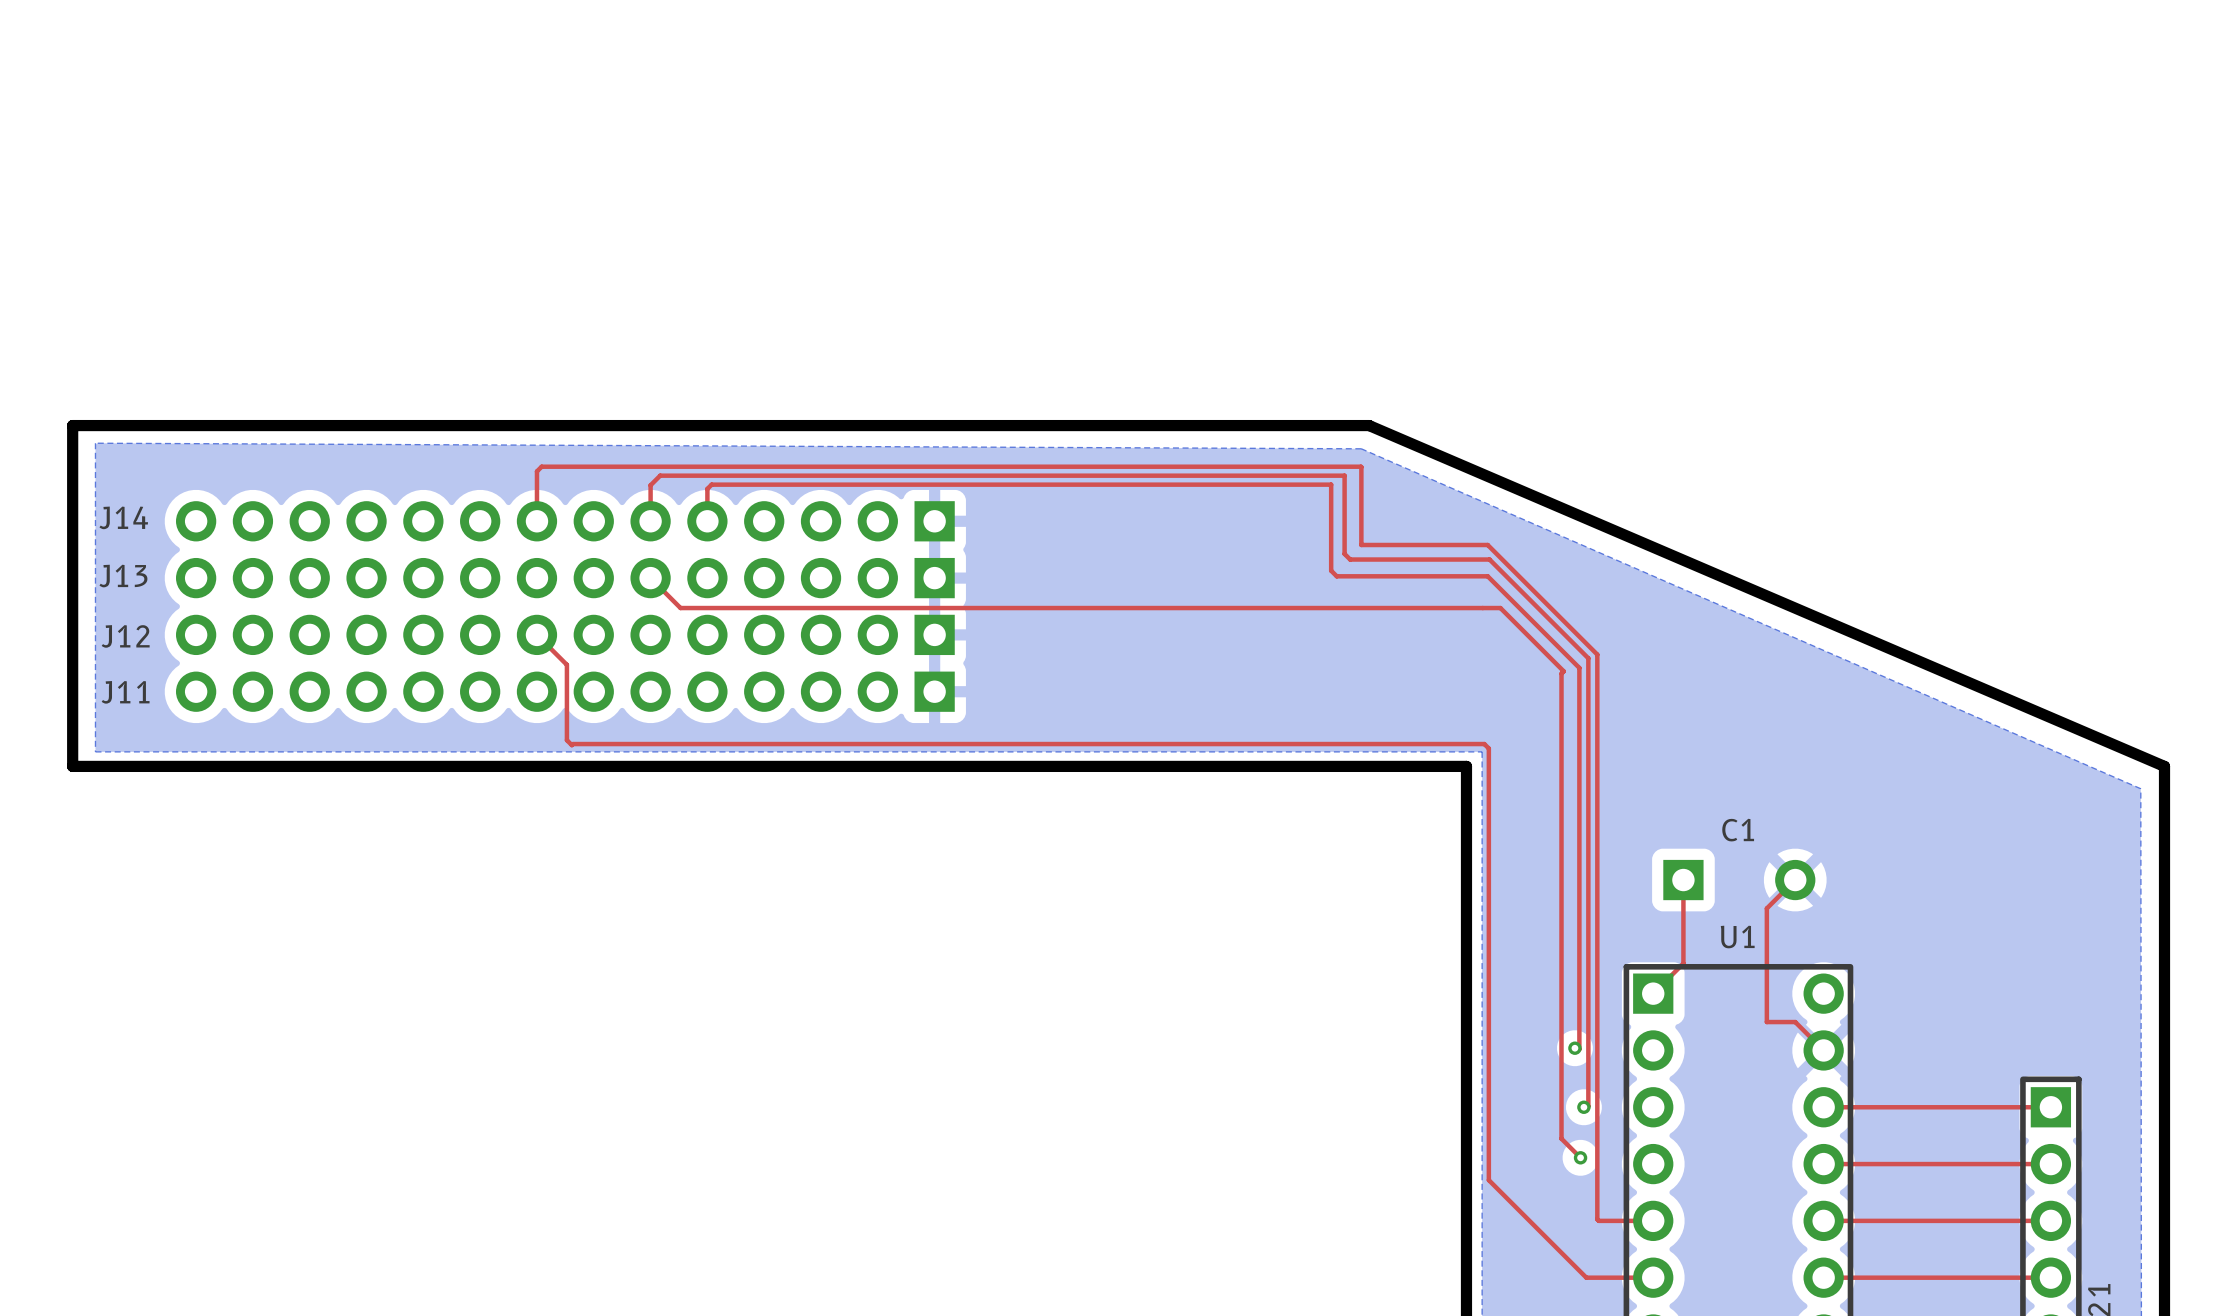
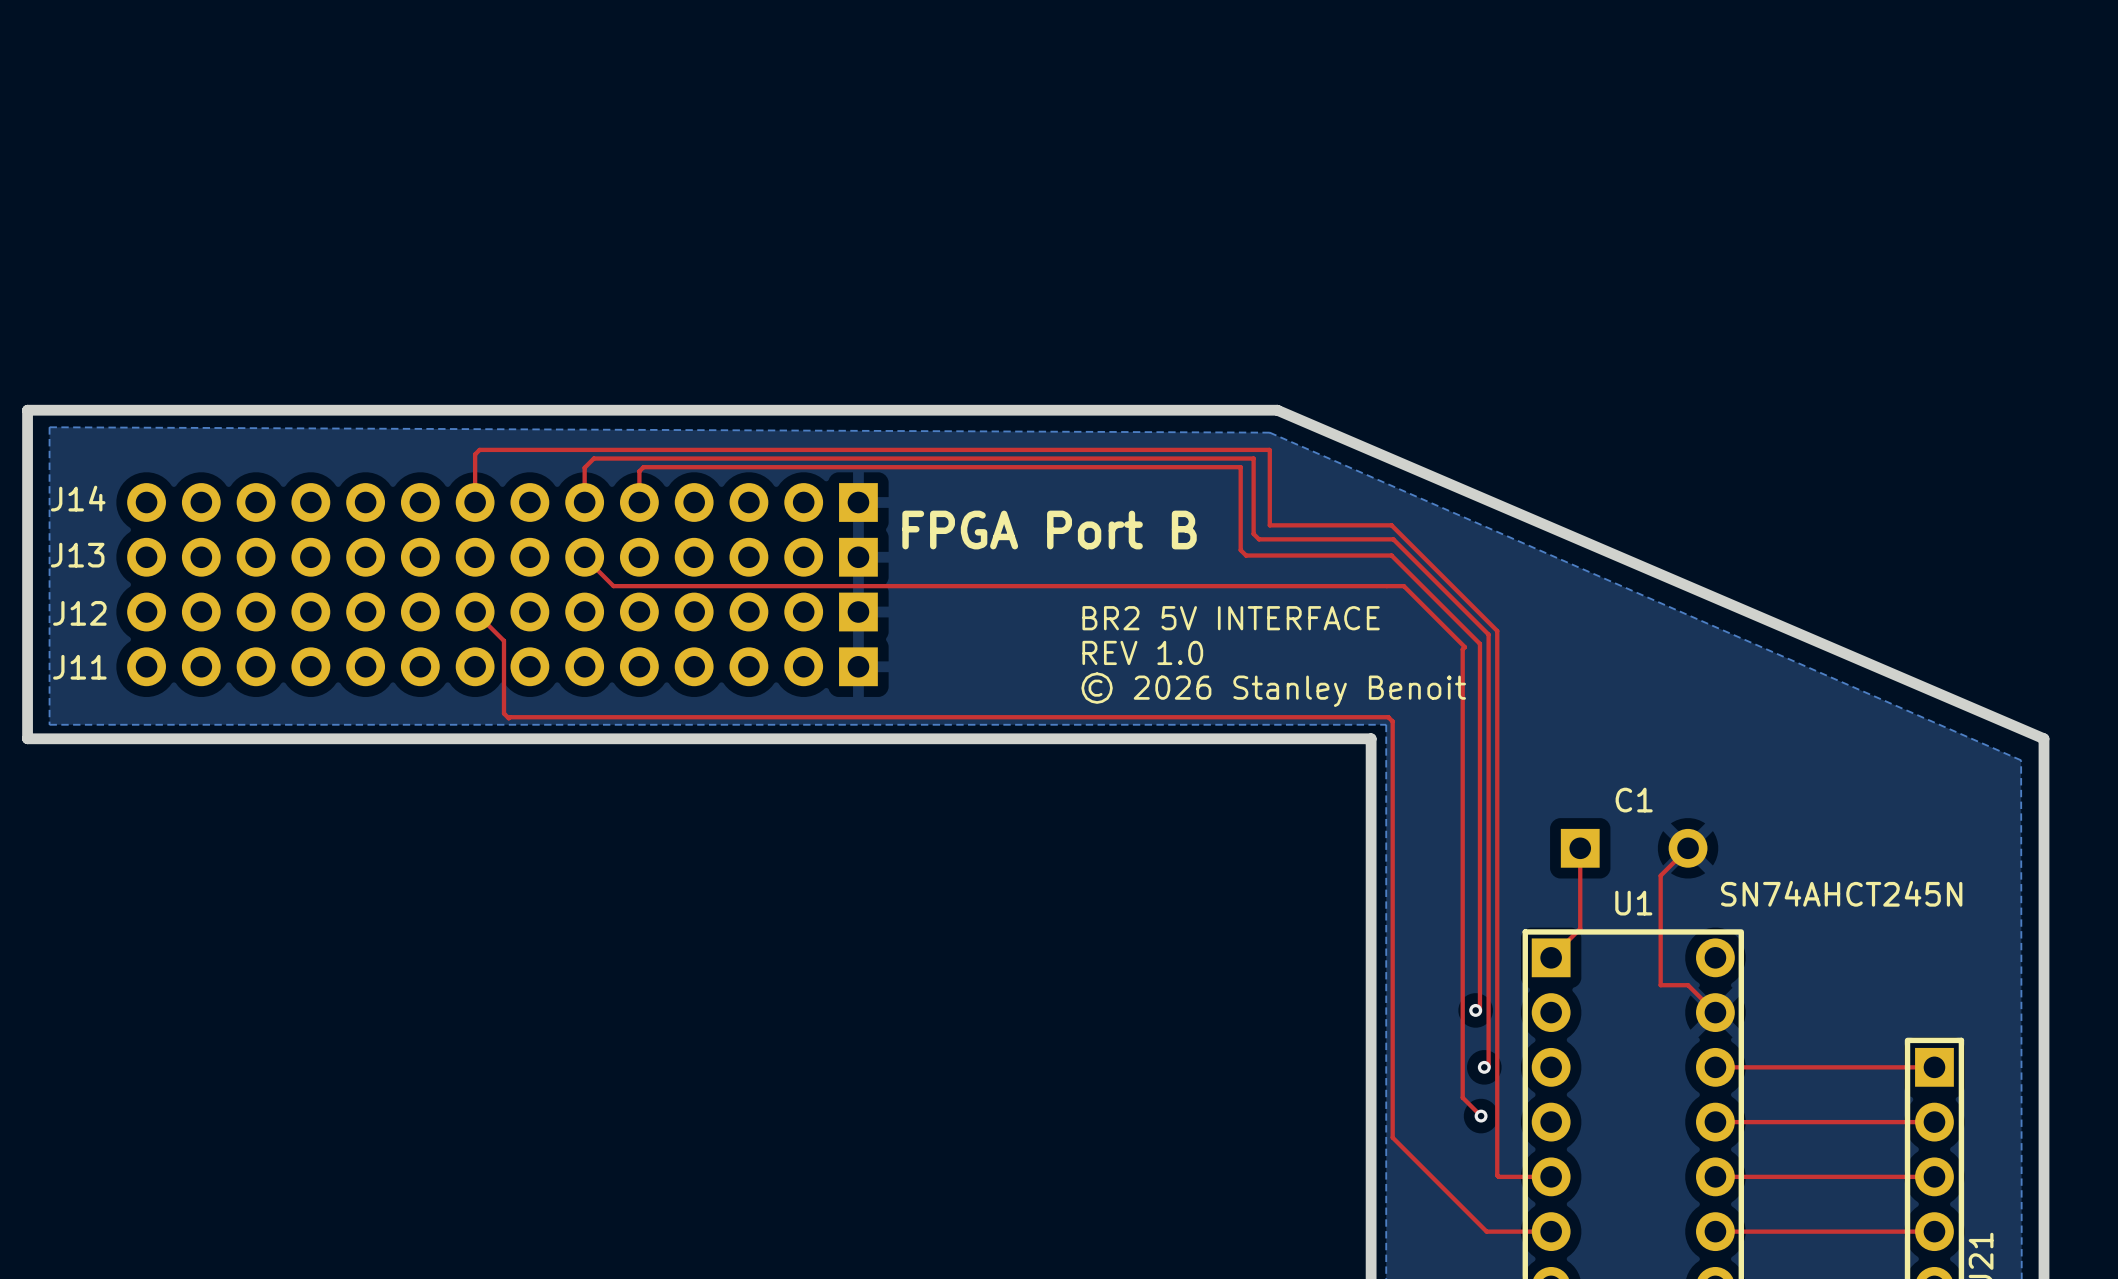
text: none -> FPGA Port B (1049, 530)
text: none -> BR2 5V INTERFACE (1231, 618)
text: none -> REV 1.0 (1142, 652)
text: none -> © 2026 Stanley Benoit (1273, 689)
U1 value: none -> SN74AHCT245N (1841, 893)

